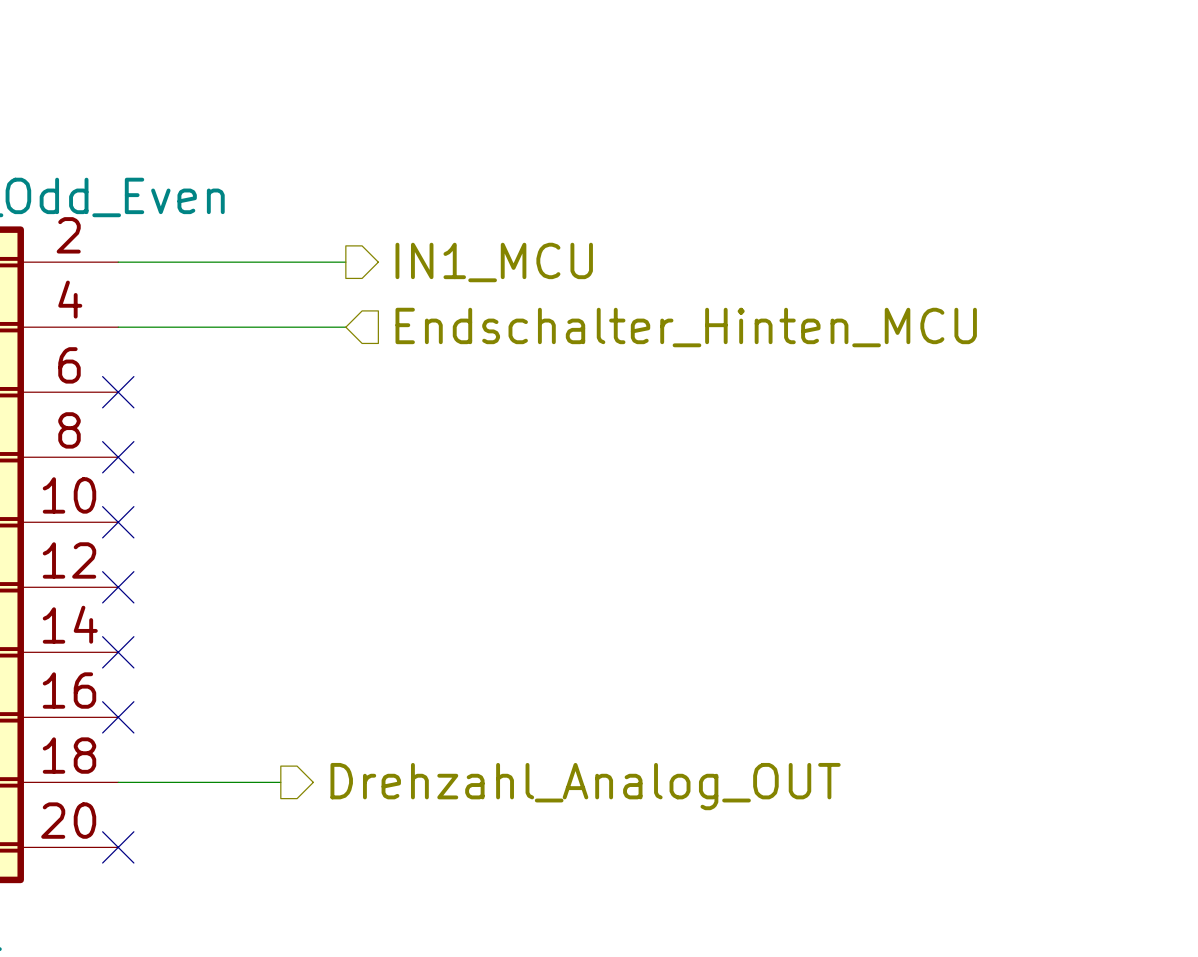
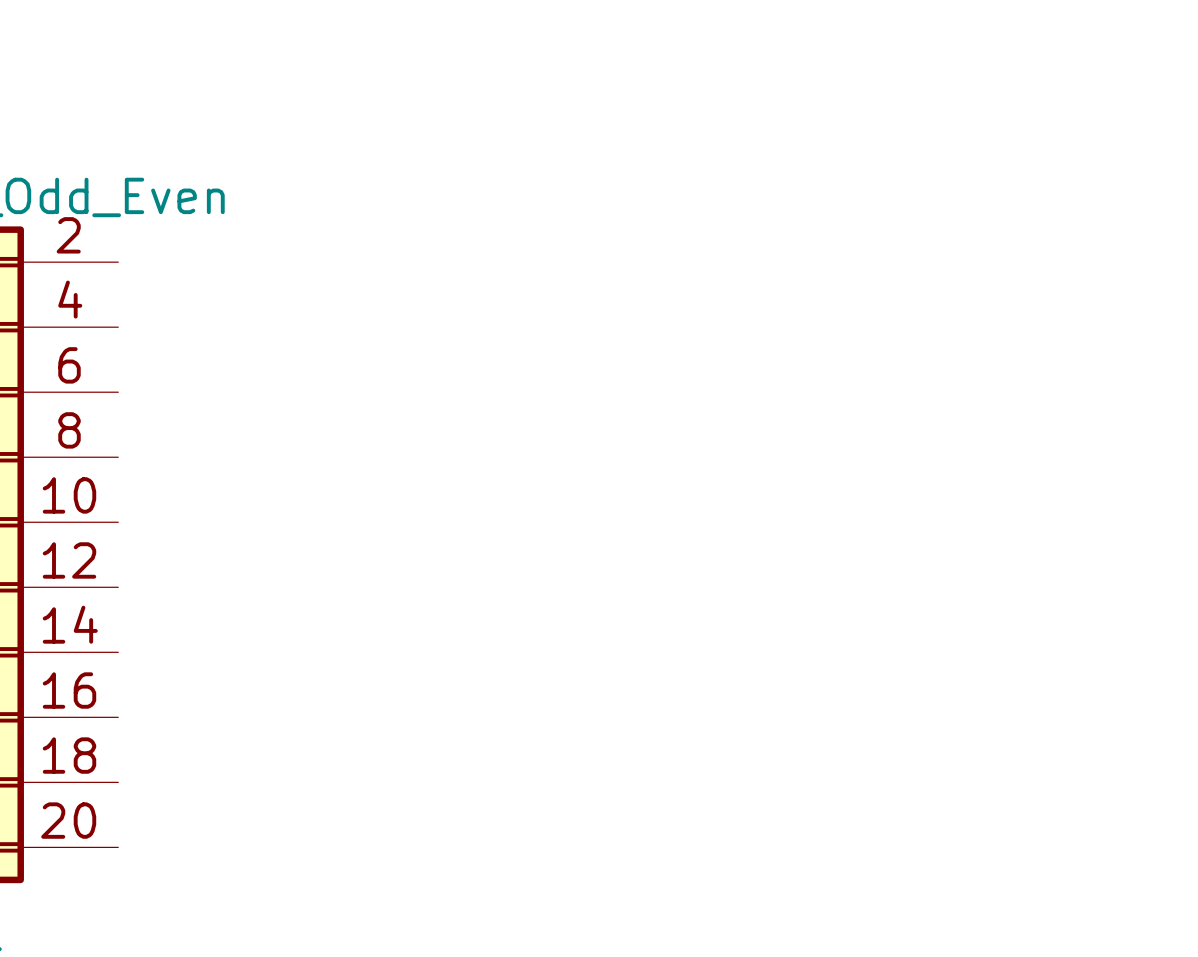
wire: (118, 262) (345, 262) -> none
hierarchical label: IN1_MCU (494, 262) -> none
wire: (118, 327) (345, 327) -> none
hierarchical label: Endschalter_Hinten_MCU (686, 327) -> none
no-connect mark: (118, 392) -> none
no-connect mark: (118, 457) -> none
no-connect mark: (118, 522) -> none
no-connect mark: (118, 587) -> none
no-connect mark: (118, 652) -> none
no-connect mark: (118, 717) -> none
wire: (118, 782) (280, 782) -> none
hierarchical label: Drehzahl_Analog_OUT (585, 786) -> none
no-connect mark: (118, 847) -> none

